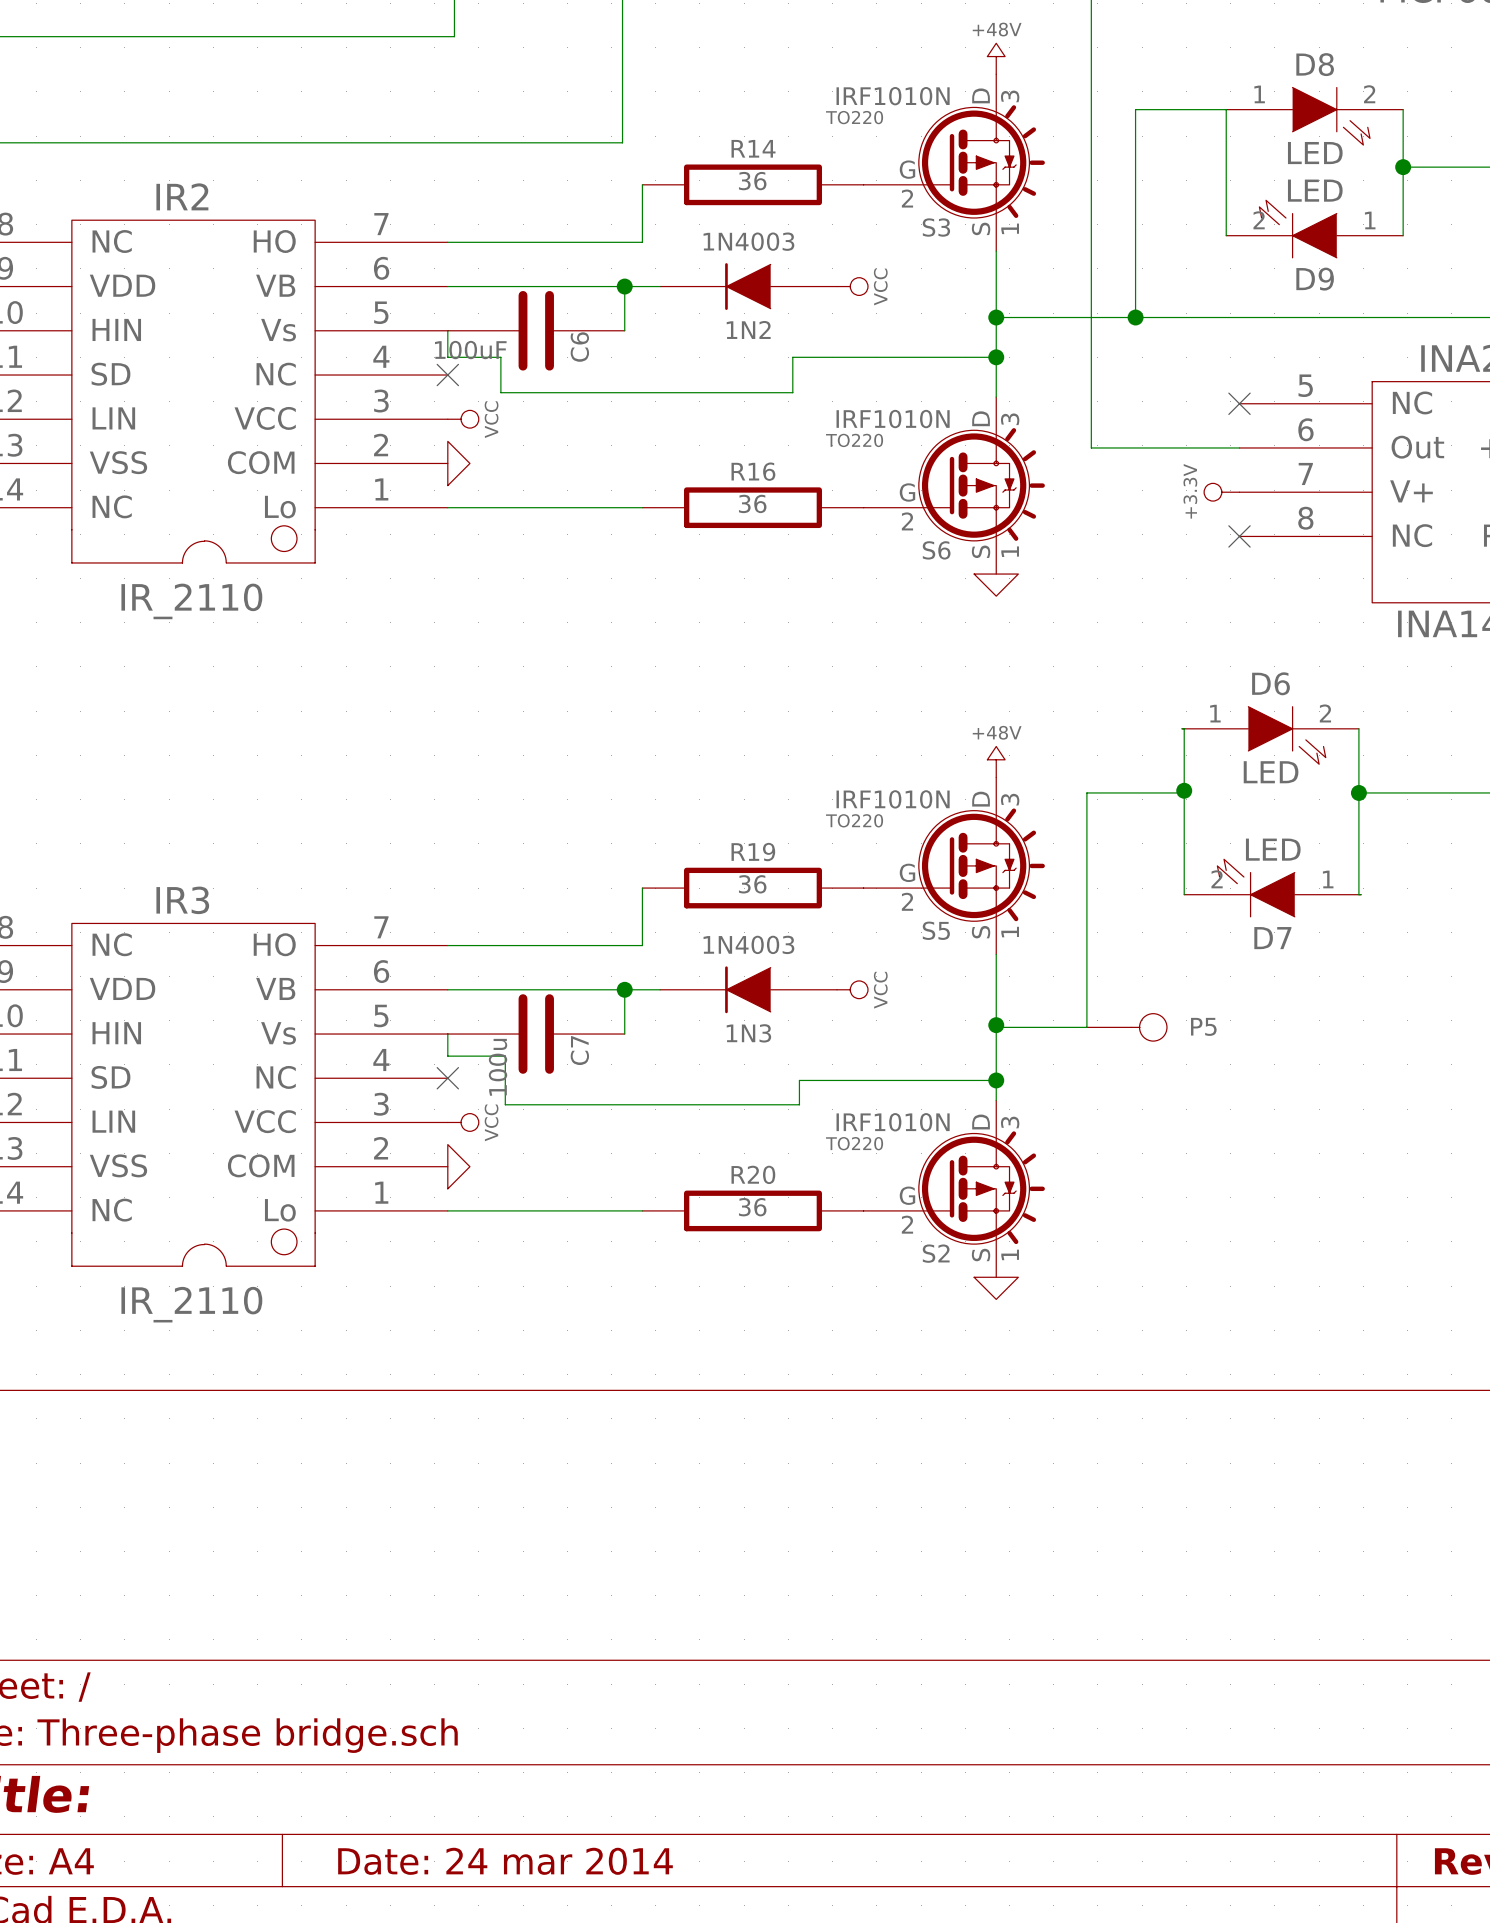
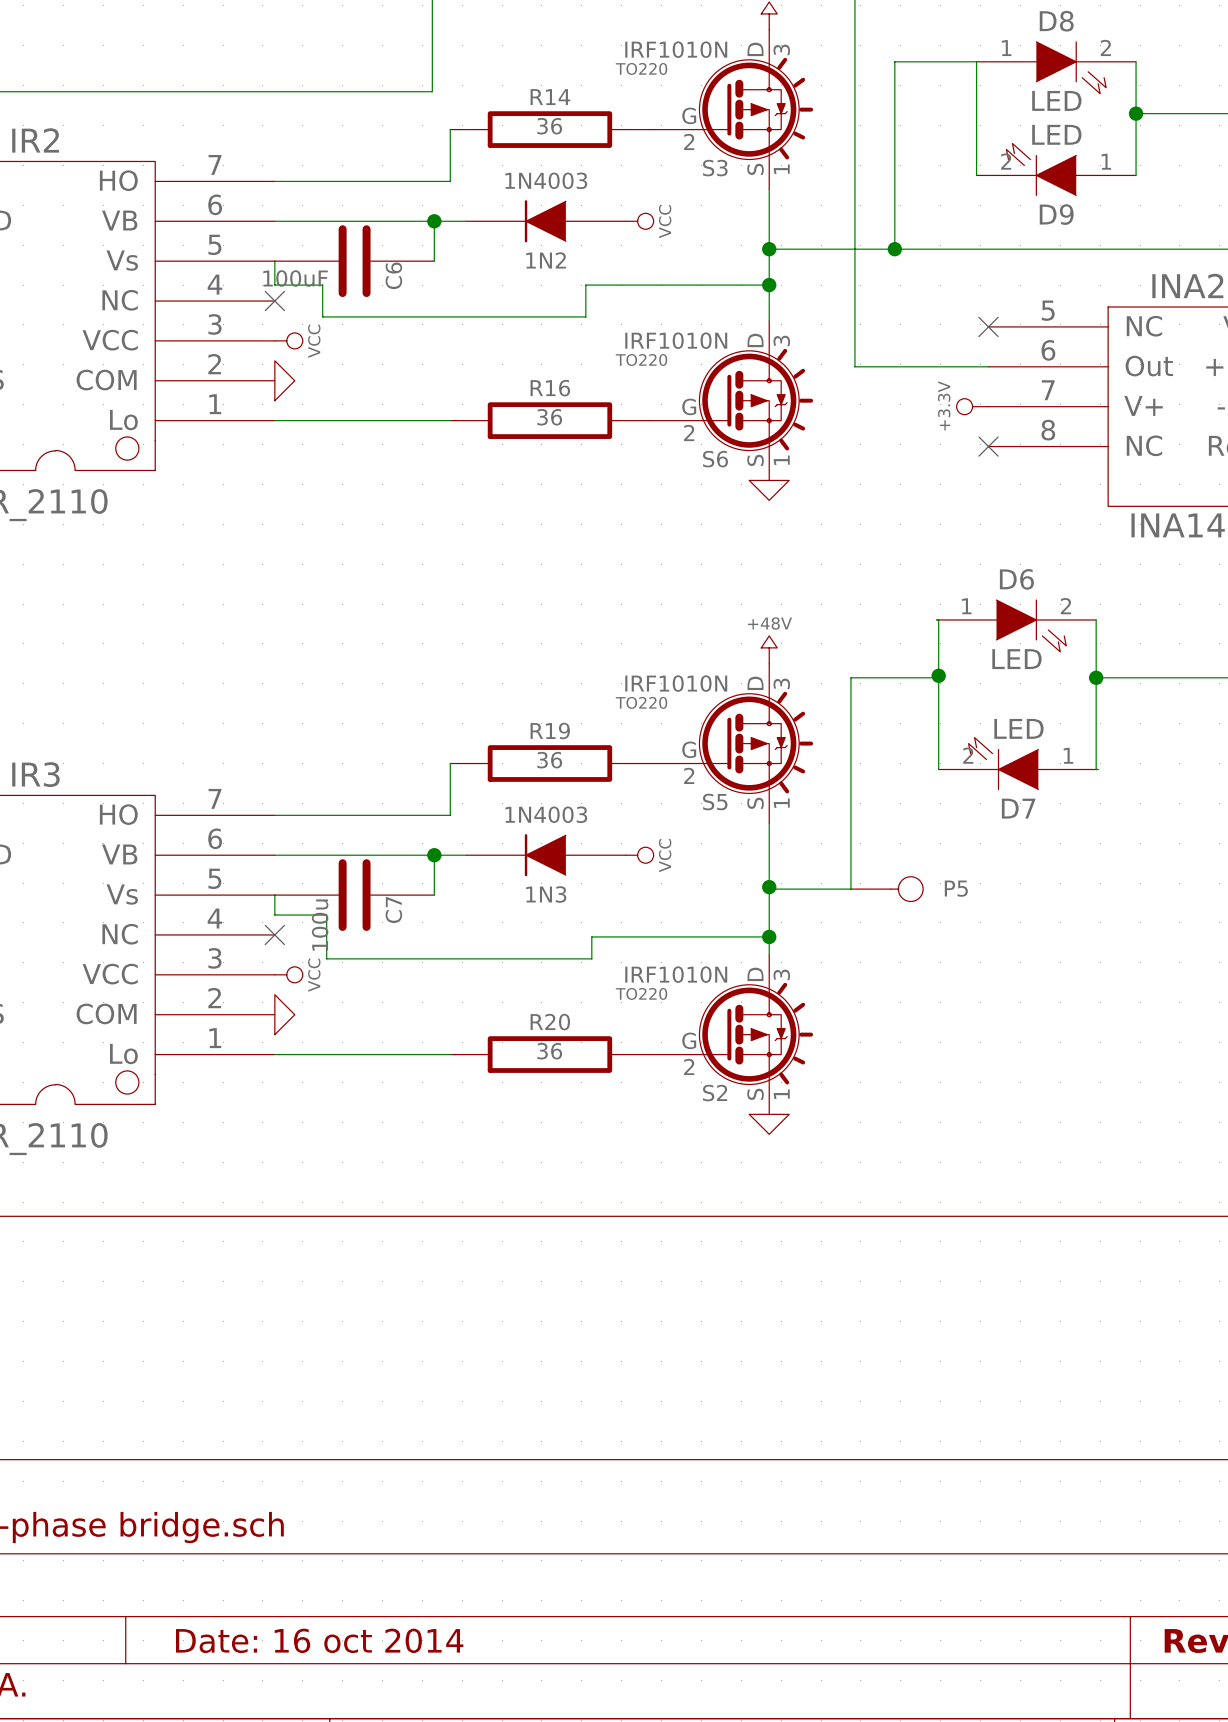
title block: Date: 24 mar 2014 (505, 1861) -> Date: 16 oct 2014 (319, 1640)

